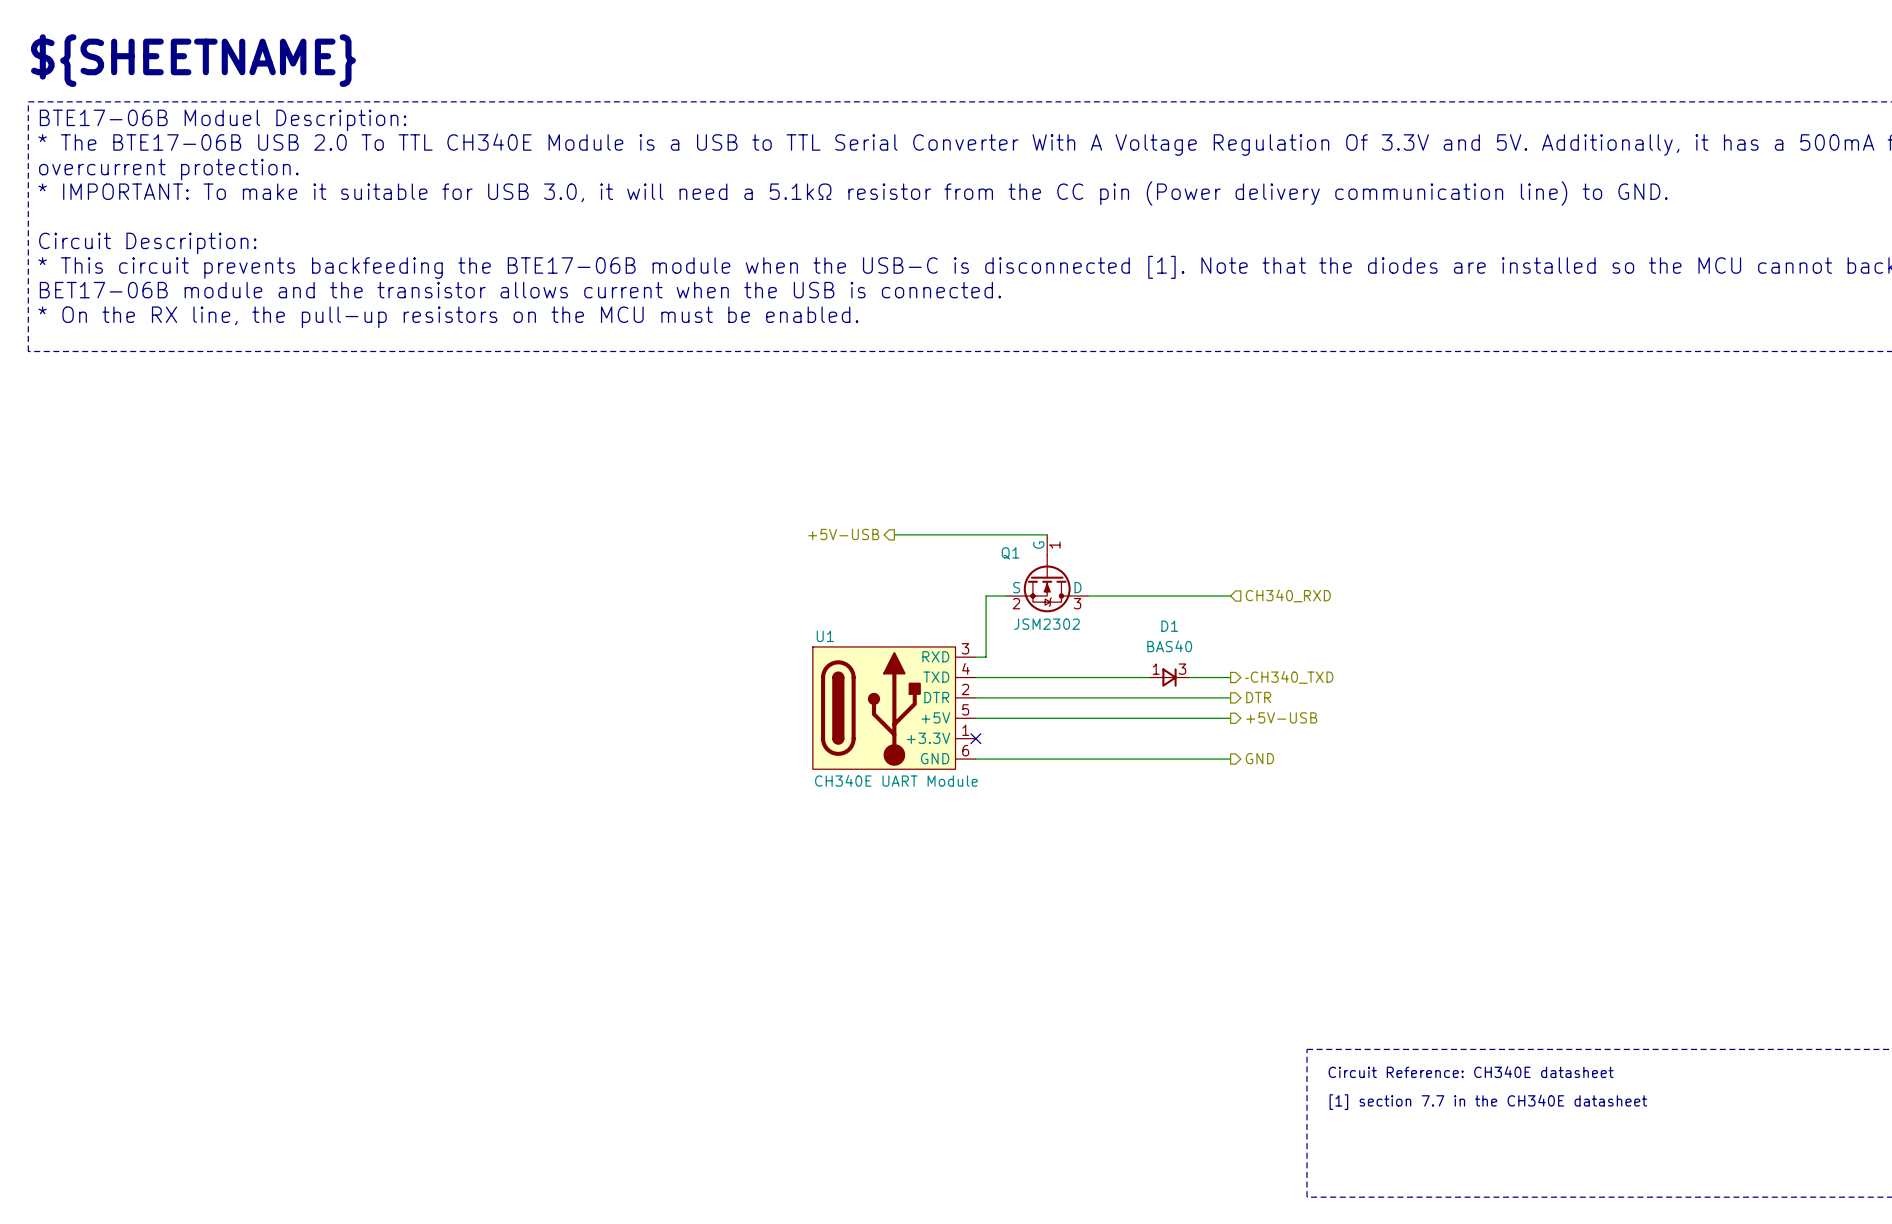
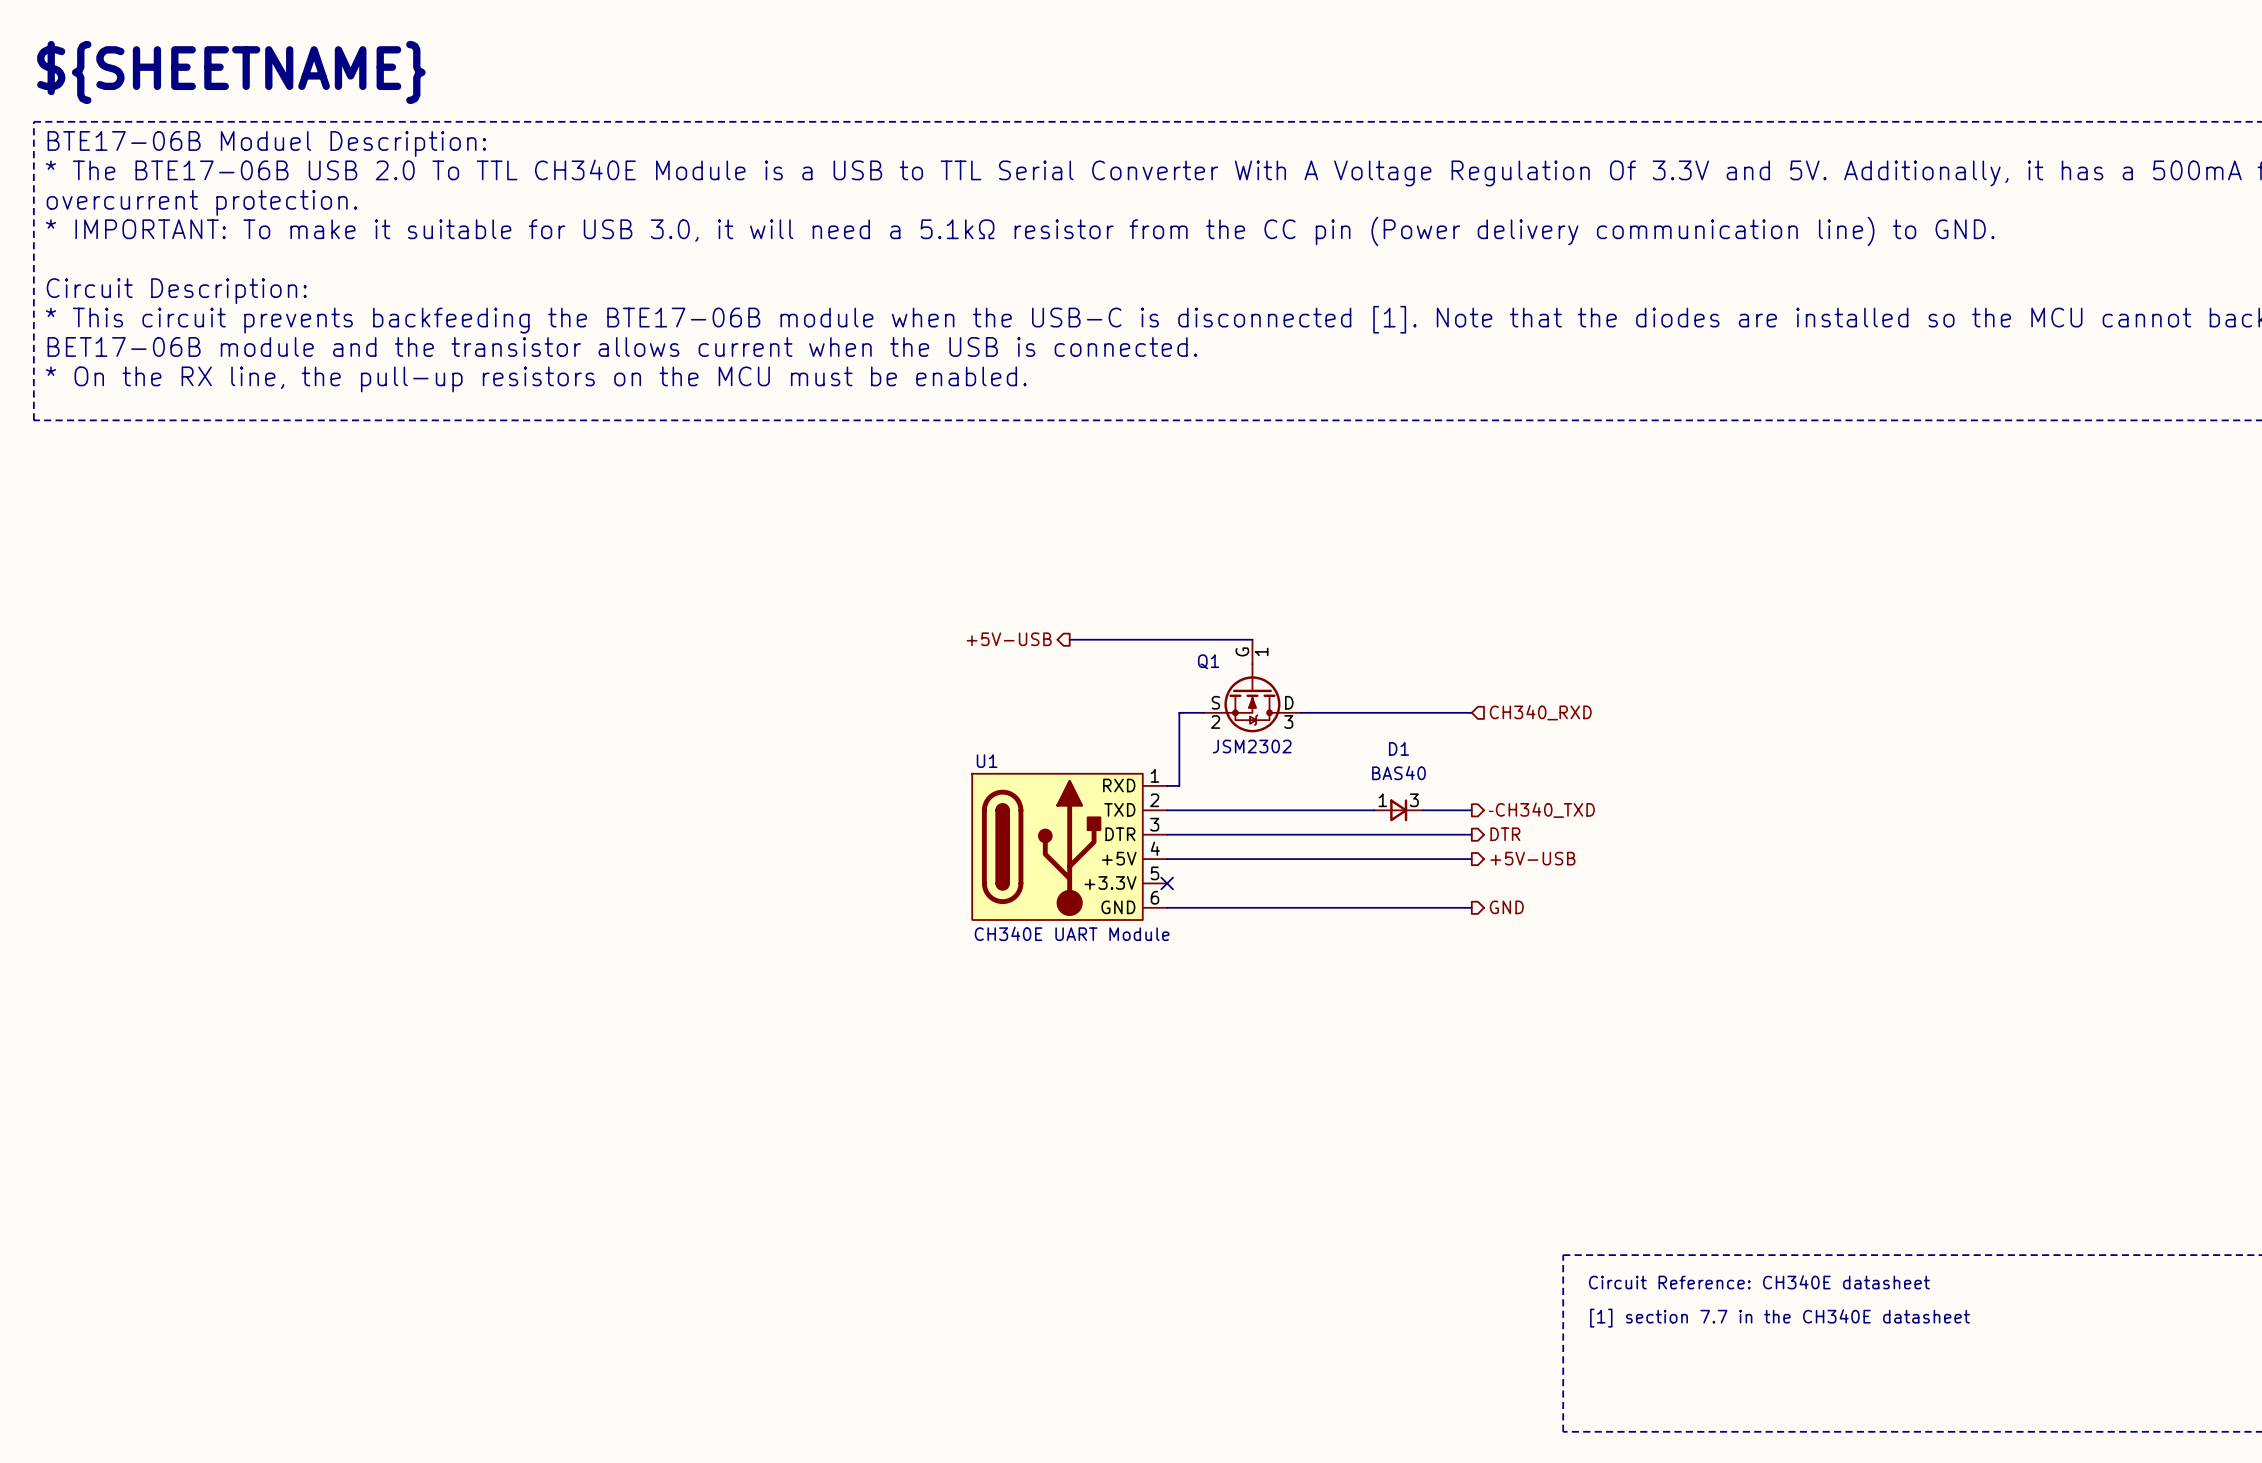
U1 pin number: 3 (965, 648) -> 1 (1154, 775)
U1 pin number: 4 (965, 668) -> 2 (1154, 800)
U1 pin number: 2 (965, 689) -> 3 (1154, 824)
U1 pin number: 5 (965, 709) -> 4 (1155, 848)
U1 pin number: 1 (965, 730) -> 5 (1154, 873)

